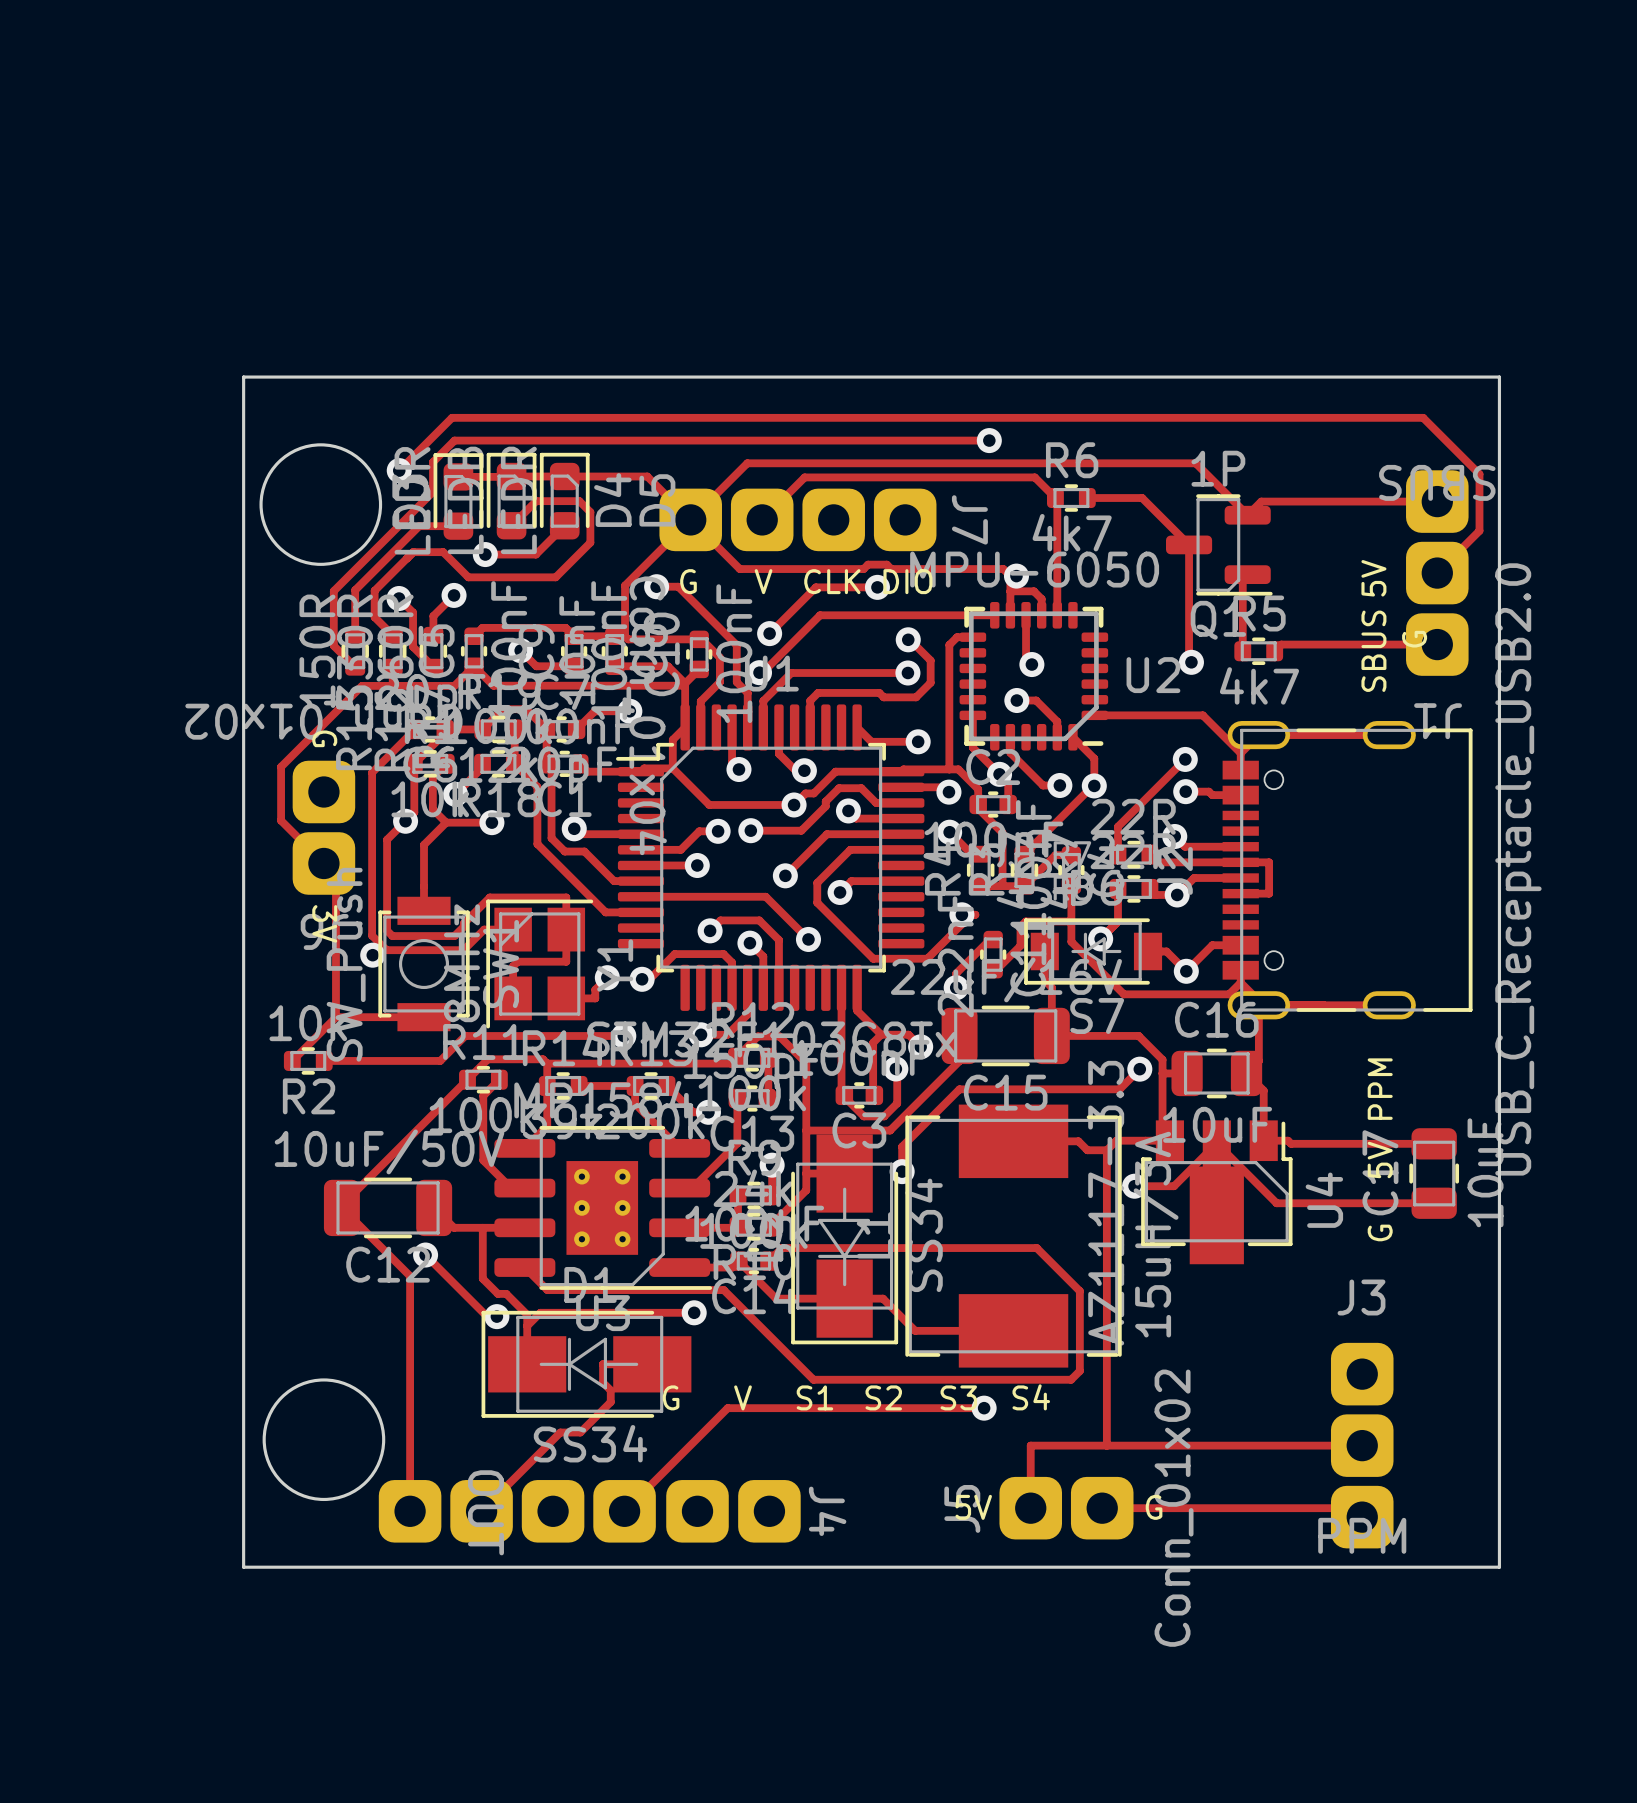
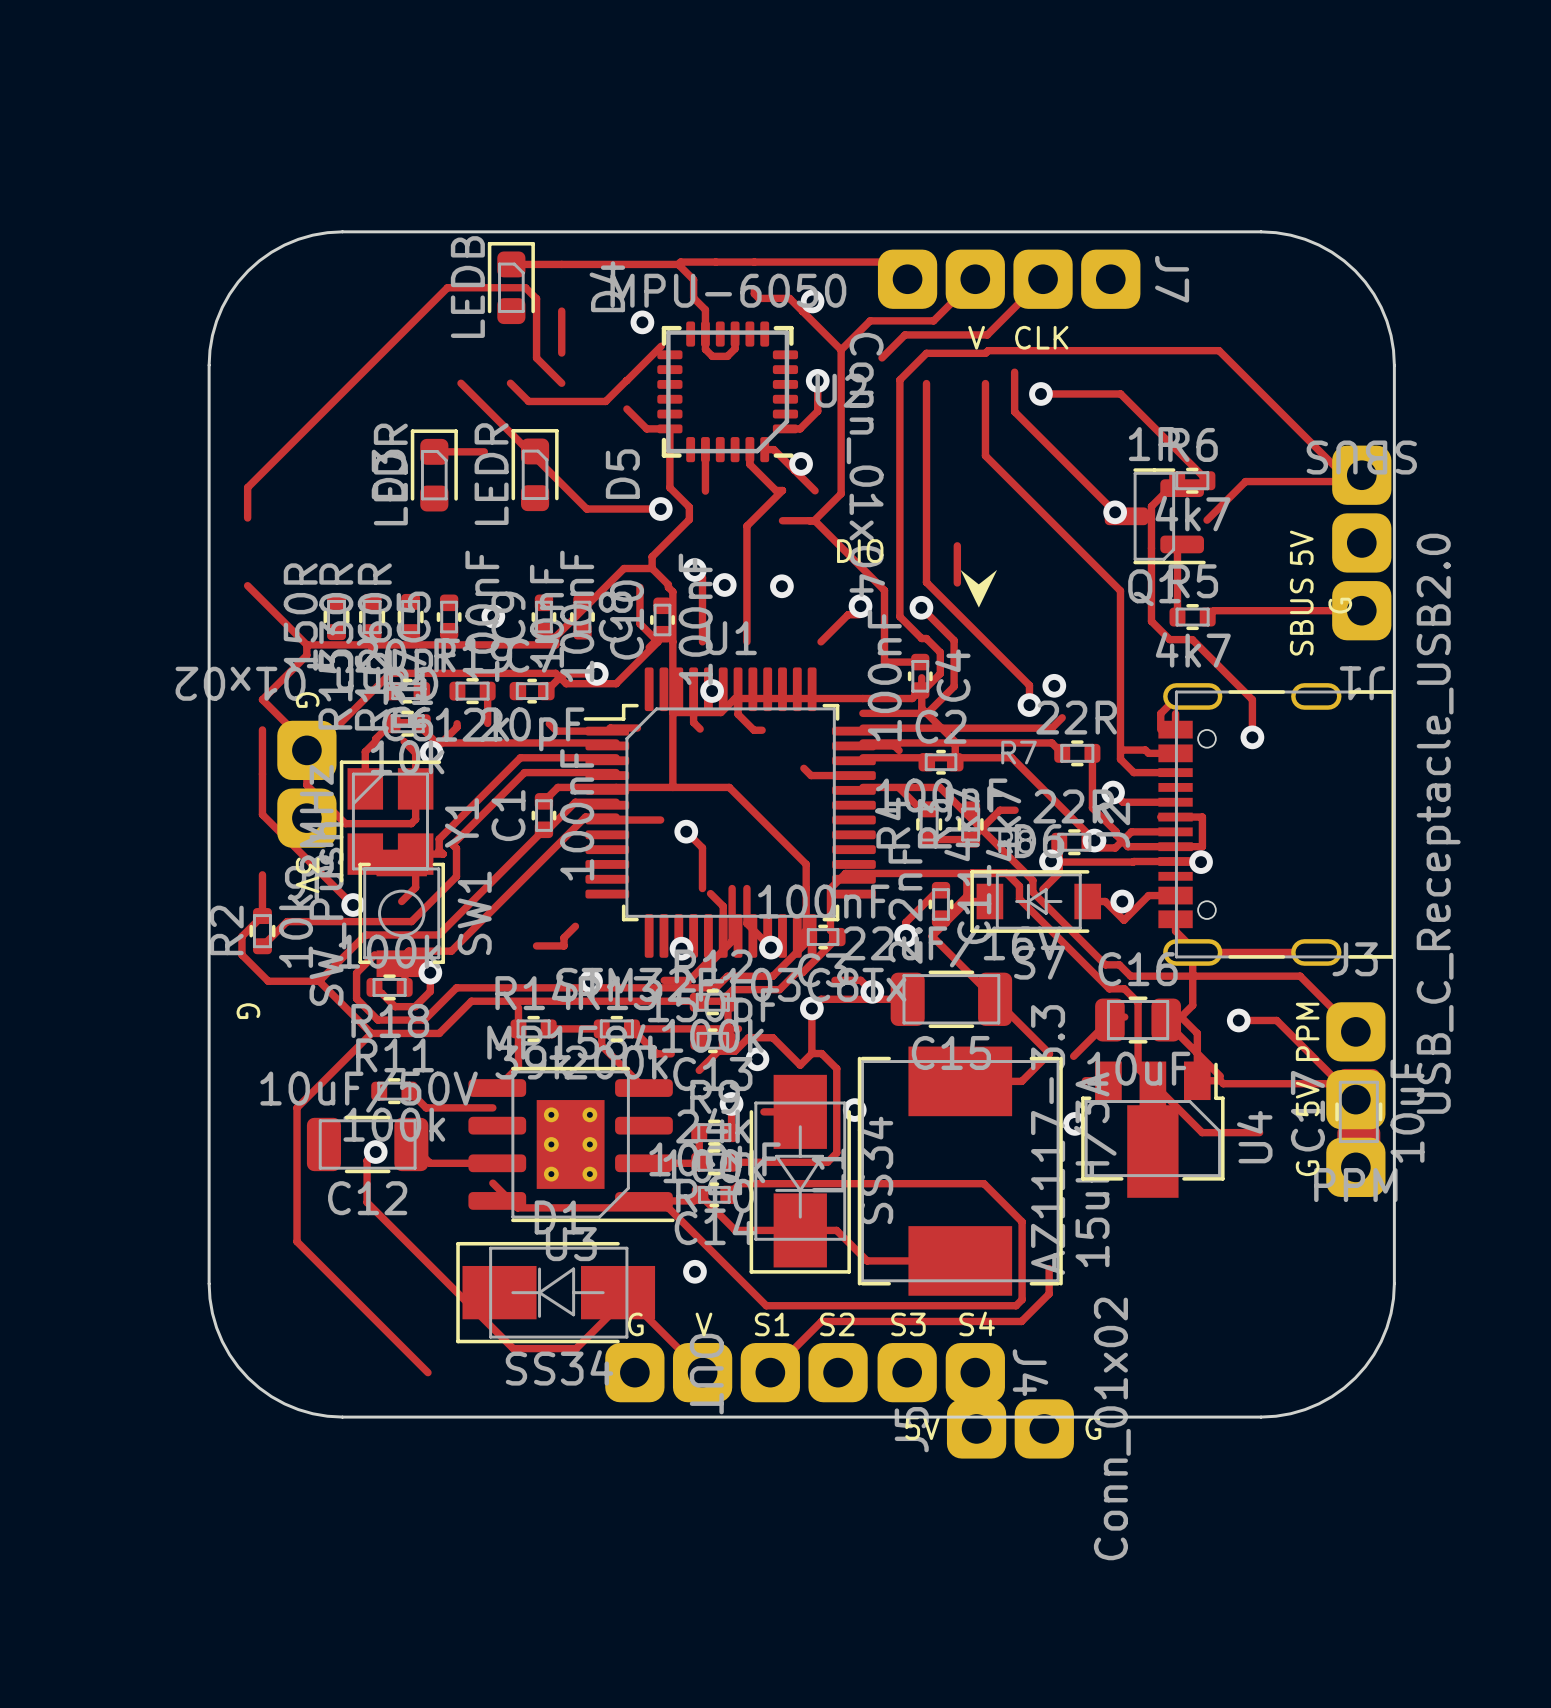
track: none -> (511, 264) (678, 264)
track: none -> (678, 264) (693, 279) (693, 298) (705, 309) (705, 349) (712, 356) (727, 356) (735, 348) (735, 334)
track: none -> (678, 264) (680, 262) (890, 262) (907, 279)
track: none -> (975, 279) (933, 320) (870, 320) (841, 349)
track: none -> (1043, 279) (987, 334) (905, 334) (882, 357)
track: none -> (754, 290) (754, 293) (758, 298) (789, 298) (841, 349)
via: none -> (812, 301)
track: none -> (561, 311) (561, 353)
via: none -> (642, 322)
track: none -> (661, 346) (626, 380)
track: none -> (841, 349) (841, 493) (814, 520)
board edge: (243, 377) (1499, 377) (1499, 1567) (243, 1567) (243, 377) -> (342, 231) (312, 235) (284, 245) (259, 260) (248, 270) (229, 294) (222, 307) (212, 335) (209, 350) (209, 1283) (209, 1298) (216, 1327) (229, 1354) (238, 1366) (259, 1388) (284, 1403) (312, 1413) (342, 1417) (1261, 1417) (1275, 1416) (1305, 1409) (1331, 1396) (1344, 1388) (1365, 1366) (1381, 1341) (1391, 1313) (1394, 1283) (1394, 365) (1391, 335) (1386, 321) (1373, 294) (1365, 282) (1344, 260) (1318, 245) (1290, 235) (1261, 231) (342, 231)
track: none -> (1014, 372) (1014, 411) (1115, 512)
track: none -> (626, 380) (605, 401) (528, 401) (510, 383)
track: none -> (817, 380) (817, 411) (800, 428) (785, 428)
via: none -> (817, 380)
track: none -> (460, 383) (586, 509) (660, 509)
track: none -> (561, 383) (536, 358) (536, 298) (525, 287) (447, 287) (247, 487) (247, 517)
track: none -> (926, 383) (926, 582) (1029, 685) (1029, 705)
track: none -> (985, 383) (985, 455) (1120, 590) (1120, 759) (1133, 772) (1160, 772)
track: none -> (1040, 393) (1120, 393) (1207, 480)
via: none -> (1040, 393)
track: none -> (626, 409) (646, 428) (669, 428) (669, 487) (689, 507) (689, 519) (652, 556) (652, 568)
track: (989, 440) (454, 440) (433, 462) (433, 491) (333, 591) (333, 645) (355, 667) -> none
via: (989, 440) -> none
round board edge: [259, 443, 383, 566] -> none
track: (399, 470) (452, 417) (1423, 417) (1479, 474) (1479, 530) (1437, 573) -> none
via: (399, 470) -> none
track: none -> (705, 449) (705, 491)
track: none -> (749, 449) (749, 464) (775, 490) (782, 490) (746, 526) (746, 641)
track: none -> (764, 449) (773, 449) (815, 490)
track: (511, 476) (647, 476) (739, 569) (863, 569) (868, 564) (886, 564) (891, 569) (1003, 569) (1010, 576) (1016, 576) -> none
via: none -> (801, 463)
D4 position: (511, 496) -> (511, 283)
R6 position: (1071, 498) -> (1192, 480)
track: (1087, 498) (1142, 498) (1189, 544) (1189, 659) (1191, 662) -> none
track: (1437, 501) (1261, 501) (1247, 515) (1195, 463) (747, 463) (625, 585) (625, 636) -> none
track: none -> (1177, 480) (1151, 506) (1151, 621) (1169, 639) (1192, 639) (1252, 699) (1252, 737)
track: (762, 519) (804, 477) (1034, 477) (1057, 499) (1057, 615) -> none
J7 position: (797, 519) -> (1009, 279)
track: (511, 525) (536, 501) (579, 501) (590, 512) (590, 542) (555, 577) (468, 577) (443, 552) (413, 552) (374, 590) (374, 617) (392, 635) -> none
track: (564, 525) (535, 554) (485, 554) -> none
track: (458, 526) (419, 526) (355, 590) (355, 635) -> none
via: none -> (660, 509)
via: none -> (1115, 512)
track: none -> (1207, 520) (1245, 481) (1349, 481) (1219, 350) (988, 350) (985, 353) (926, 353) (899, 379) (899, 616) (921, 638) (926, 638) (940, 652) (940, 673) (912, 698) (735, 698) (721, 712) (672, 712)
track: none -> (782, 520) (814, 520) (884, 590) (884, 662) (920, 662)
via: (485, 554) -> none
via: (1016, 576) -> none
text rotation: 0° (688, 581) -> 90° clockwise (248, 1011)
text position: G (688, 581) -> G (248, 1011)
text position: V (763, 581) -> V (976, 337)
text position: CLK (832, 581) -> CLK (1041, 337)
track: (656, 586) (678, 586) (736, 645) (736, 682) (747, 693) (747, 727) -> none
via: (656, 586) -> none
track: (877, 587) (815, 587) (769, 633) -> none
via: (877, 587) -> none
track: (1010, 591) (1033, 591) (1041, 599) (1041, 615) -> none
track: (454, 595) (433, 616) (433, 635) -> none
via: (454, 595) -> none
track: (399, 598) (413, 612) (413, 646) (433, 667) -> none
via: (399, 598) -> none
track: none -> (652, 568) (672, 591) (672, 787)
track: none -> (652, 568) (623, 568) (555, 636) (555, 644) (306, 644)
track: none -> (694, 570) (702, 577) (702, 641)
via: none -> (694, 570)
drawing: none -> [960, 570, 997, 608]
track: (994, 615) (820, 615) (762, 672) (759, 672) -> none
track: (1026, 615) (1026, 658) (1031, 664) -> none
track: none -> (247, 585) (306, 644)
via: none -> (781, 586)
track: none -> (639, 587) (639, 623) (658, 641) (616, 683) (566, 683) (555, 673) (390, 673) (338, 724)
via position: (769, 633) -> (724, 584)
track: (474, 636) (482, 627) (565, 627) (574, 636) (625, 636) -> none
track: (625, 636) (628, 639) (701, 639) (719, 657) (719, 682) (700, 701) (700, 727) -> none
track: (972, 637) (957, 637) (949, 644) (949, 769) -> none
track: (908, 639) (908, 638) (930, 660) (930, 682) (916, 697) (883, 697) (879, 692) (818, 692) (810, 700) (810, 727) -> none
track: none -> (921, 607) (954, 640) (954, 686) (927, 713) (862, 713)
via: none -> (921, 607)
track: none -> (859, 614) (848, 614) (821, 641)
track: (520, 650) (536, 666) (574, 666) -> none
via: (1191, 662) -> none
via: (1031, 664) -> none
track: (614, 666) (667, 666) (685, 683) (685, 727) (672, 739) (672, 768) (709, 804) (794, 804) (805, 793) (813, 793) (835, 771) (958, 769) (978, 789) (978, 808) (1002, 832) (1002, 886) -> none
via: (759, 672) -> none
track: (907, 672) (791, 672) (763, 701) (763, 727) -> none
via: (907, 672) -> none
U2 position: (1033, 676) -> (727, 391)
track: none -> (306, 644) (306, 655) (262, 699) (306, 744) (306, 785) (345, 823) (411, 823) (415, 819) (415, 753) (404, 741)
track: (685, 685) (493, 685) (474, 666) (454, 685) (362, 685) (281, 766) (281, 820) (335, 875) (335, 1017) -> none
track: (1016, 700) (1036, 700) (1057, 721) (1057, 737) -> none
via: (1016, 700) -> none
track: (1094, 715) (1202, 715) (1240, 753) (1258, 735) (1389, 735) -> none
via: none -> (1054, 685)
track: (857, 727) (871, 741) (918, 741) -> none
track: (415, 729) (372, 772) (372, 935) (382, 945) -> none
track: (546, 729) (546, 760) (551, 765) (551, 838) (564, 851) (584, 851) (614, 881) (640, 881) -> none
track: (546, 729) (526, 709) (503, 709) (482, 729) (445, 729) (445, 732) (414, 763) (414, 812) (387, 839) (387, 930) (392, 936) (454, 936) (463, 926) (463, 923) (489, 897) (566, 897) (566, 961) (517, 961) (513, 966) (513, 998) -> none
via: none -> (712, 691)
track: none -> (1177, 696) (1160, 713) (1160, 729)
track: (1010, 737) (1010, 752) (1043, 785) (1059, 785) -> none
track: (1072, 737) (1094, 758) (1094, 785) (1024, 854) -> none
via: (918, 741) -> none
via: none -> (1029, 705)
track: none -> (1062, 717) (1051, 728) (862, 728)
via: (1185, 759) -> none
track: (1189, 759) (1185, 759) (1117, 826) (1117, 854) -> none
track: (446, 763) (432, 777) (432, 809) (446, 822) -> none
R18 position: (498, 763) -> (389, 987)
track: (514, 763) (537, 786) (537, 844) (605, 912) (640, 912) -> none
C1 rotation: 0° (564, 763) -> 90° clockwise (543, 815)
C1 position: (564, 763) -> (543, 815)
via: (738, 769) -> none
track: none -> (262, 729) (262, 814) (346, 898)
via: (804, 770) -> none
via: (999, 774) -> none
via: none -> (1252, 737)
track: none -> (616, 742) (436, 742) (416, 722) (392, 722) (365, 751) (365, 788)
track: none -> (862, 742) (1051, 742) (1062, 753)
via: (1059, 785) -> none
via: (1094, 785) -> none
via: (1185, 791) -> none
via: (948, 792) -> none
track: none -> (1092, 753) (1092, 808) (1116, 831) (1116, 834) (1127, 846) (1175, 846)
track: none -> (616, 757) (520, 757) (439, 839) (439, 850) (443, 854) (415, 854) (415, 887) (401, 901)
track: none -> (862, 757) (1011, 757) (1094, 840)
track: (901, 802) (876, 802) (861, 788) (839, 788) (825, 801) (825, 806) (801, 830) (750, 830) -> none
via: (794, 804) -> none
via: (848, 810) -> none
track: none -> (616, 772) (524, 772) (452, 844) (456, 848) (456, 876) (411, 921) (287, 921) (262, 946)
via: (405, 821) -> none
track: (446, 822) (491, 822) -> none
track: (446, 822) (424, 844) (424, 910) -> none
via: (491, 822) -> none
track: (574, 828) (579, 834) (640, 834) -> none
via: (574, 828) -> none
via: (750, 830) -> none
track: (718, 831) (699, 831) (680, 849) (640, 849) -> none
via: (718, 831) -> none
track: none -> (862, 787) (939, 787) (1032, 880) (1032, 892) (1105, 964) (1119, 964) (1130, 976) (1300, 976) (1355, 1031)
via: (949, 832) -> none
track: (901, 834) (826, 834) (785, 875) -> none
track: none -> (543, 801) (557, 787) (729, 787) (806, 864) (806, 934) (808, 940) (772, 976) (727, 976) (715, 987) (456, 987) (424, 1020) (377, 1020) (356, 998) (356, 973) (374, 954)
track: none -> (616, 802) (575, 802) (547, 829) (543, 829) (438, 934) (365, 934) (319, 981)
track: (901, 849) (850, 849) (817, 882) (817, 902) (873, 958) (927, 958) (961, 924) (961, 914) (975, 914) -> none
R7 position: (1133, 854) -> (1077, 753)
track: (1149, 854) (1157, 862) (1225, 862) -> none
track: none -> (616, 817) (585, 817) (451, 951) (408, 951) (404, 954) (404, 987)
via: (697, 865) -> none
C4 position: (1071, 870) -> (920, 676)
via: (785, 875) -> none
track: none -> (686, 831) (702, 847) (702, 888)
via: none -> (686, 831)
track: (901, 881) (851, 881) (840, 892) -> none
track: (1071, 885) (1071, 941) (1123, 994) (1229, 994) (1240, 982) -> none
via: (840, 892) -> none
via position: (1177, 894) -> (1094, 840)
track: (640, 896) (765, 896) (808, 939) -> none
track: none -> (1051, 861) (1160, 861)
via: none -> (1201, 862)
via: (961, 914) -> none
track: none -> (262, 874) (262, 916) (241, 936) (241, 954) (268, 981) (319, 981)
track: (513, 929) (484, 929) (463, 950) (386, 950) (382, 945) -> none
track: (710, 930) (720, 920) (759, 920) (778, 940) (778, 987) -> none
via: (710, 930) -> none
track: none -> (732, 888) (732, 941) (707, 966)
track: none -> (746, 888) (746, 923) (770, 947)
via position: (1100, 938) -> (1051, 861)
via: (808, 939) -> none
via: (749, 943) -> none
track: (1044, 951) (1044, 980) (1051, 987) (1051, 1035) (1138, 1035) (1162, 1059) (1161, 1140) -> (989, 901) (966, 901) (932, 936) (1049, 1053) (1021, 1081)
Y1 position: (539, 964) -> (390, 821)
via position: (1186, 971) -> (1122, 901)
via: (607, 977) -> none
track: (642, 979) (649, 979) (674, 954) (723, 954) (732, 962) (732, 987) -> none
via: (642, 979) -> none
track: (841, 987) (841, 1092) (844, 1096) (863, 1116) (884, 1116) (897, 1103) (895, 1068) -> none
track: (857, 987) (857, 1010) (881, 1034) (873, 1042) (874, 1095) -> none
via: none -> (770, 947)
via: none -> (681, 948)
track: (335, 1017) (292, 1060) -> none
track: (335, 1017) (424, 1017) -> none
track: none -> (430, 972) (430, 991) (415, 1006) (395, 1006) (374, 987)
via: none -> (430, 972)
via: (701, 1034) -> none
track: none -> (319, 981) (371, 1033)
track: (959, 1035) (959, 1061) (890, 1130) (806, 1130) -> none
C15 position: (1005, 1035) -> (951, 999)
track: (623, 1036) (465, 1036) (440, 1060) (324, 1060) -> none
track: none -> (907, 999) (821, 999) (811, 1008) (811, 1053)
R2 rotation: 0° (308, 1060) -> 90° clockwise (262, 931)
R2 position: (308, 1060) -> (262, 931)
via position: (895, 1068) -> (811, 1008)
track: (1139, 1069) (1119, 1089) (959, 1089) (902, 1146) (902, 1171) -> none
via: (1139, 1069) -> none
C16 position: (1216, 1073) -> (1138, 1020)
track: none -> (1109, 1020) (1073, 1056)
track: none -> (1166, 1020) (1166, 1022) (1220, 1076)
track: none -> (1238, 1020) (1276, 1020) (1355, 1099)
via: none -> (1238, 1020)
R11 position: (483, 1079) -> (394, 1091)
track: (499, 1079) (483, 1095) (483, 1160) (510, 1188) (524, 1188) -> none
track: none -> (631, 1028) (738, 1028)
track: none -> (371, 1033) (297, 1107) (297, 1241) (427, 1372)
C3 position: (859, 1095) -> (823, 937)
track: (737, 1098) (737, 1143) (692, 1188) (679, 1188) -> none
track: none -> (811, 1053) (800, 1065) (772, 1037) (748, 1037) (735, 1051) (718, 1051) (699, 1070)
via: (708, 1112) -> none
via: none -> (757, 1059)
track: (1145, 1140) (1116, 1140) (1106, 1150) -> none
track: (1078, 1141) (1087, 1150) (1106, 1150) -> none
track: (1216, 1143) (1174, 1186) (1134, 1186) -> (1152, 1083) (1138, 1068) (1138, 1002) (1124, 988) (1109, 988) (1019, 898) (1019, 886) (1006, 873) (845, 873) (830, 888) (830, 930) (837, 937) (802, 972) (796, 972) (779, 989) (733, 989) (721, 1001) (471, 1001) (439, 1033) (371, 1033)
track: (1106, 1150) (1106, 1445) -> none
track: none -> (409, 1091) (426, 1107) (492, 1107)
track: (1268, 1195) (1276, 1203) (1434, 1203) -> (1202, 1132) (1259, 1132)
track: none -> (375, 1152) (367, 1160) (367, 1202) (513, 1348) (576, 1348) (625, 1299) (629, 1299) (702, 1372)
track: (769, 1226) (806, 1190) (806, 1063) (779, 1036) (757, 1036) (730, 1063) (547, 1063) (542, 1059) (487, 1059) (341, 1205) (341, 1207) (410, 1276) (410, 1511) -> (729, 1162) (827, 1162) (836, 1152) (836, 1068) (821, 1053) (811, 1053)
track: (482, 1227) (482, 1278) (497, 1293) (506, 1293) (527, 1314) (527, 1364) -> none
track: (780, 1249) (1036, 1248) (1079, 1291) (1079, 1371) (1071, 1379) (813, 1379) (723, 1290) (547, 1290) (524, 1267) -> (739, 1183) (983, 1183) (1022, 1221) (1022, 1299) (1016, 1305) (766, 1305) (668, 1207) (517, 1207) (492, 1183)
track: (425, 1255) (487, 1316) (496, 1316) -> none
via position: (425, 1255) -> (375, 1152)
track: (694, 1312) (540, 1312) (527, 1325) -> none
via position: (694, 1312) -> (694, 1271)
via: (496, 1316) -> none
track: none -> (1049, 1268) (1049, 1293) (1021, 1321) (821, 1321) (770, 1372)
track: (652, 1364) (603, 1364) (603, 1382) (610, 1390) (610, 1402) (580, 1432) (560, 1432) (481, 1511) -> none
round board edge: [262, 1378, 386, 1502] -> none
track: (984, 1408) (727, 1408) (624, 1511) -> none
via: (984, 1408) -> none
track: (1362, 1445) (1030, 1445) (1030, 1508) -> none
J3 position: (1362, 1445) -> (1355, 1099)
track: (1102, 1508) (1353, 1508) (1362, 1517) -> none
J4 position: (589, 1511) -> (805, 1372)

